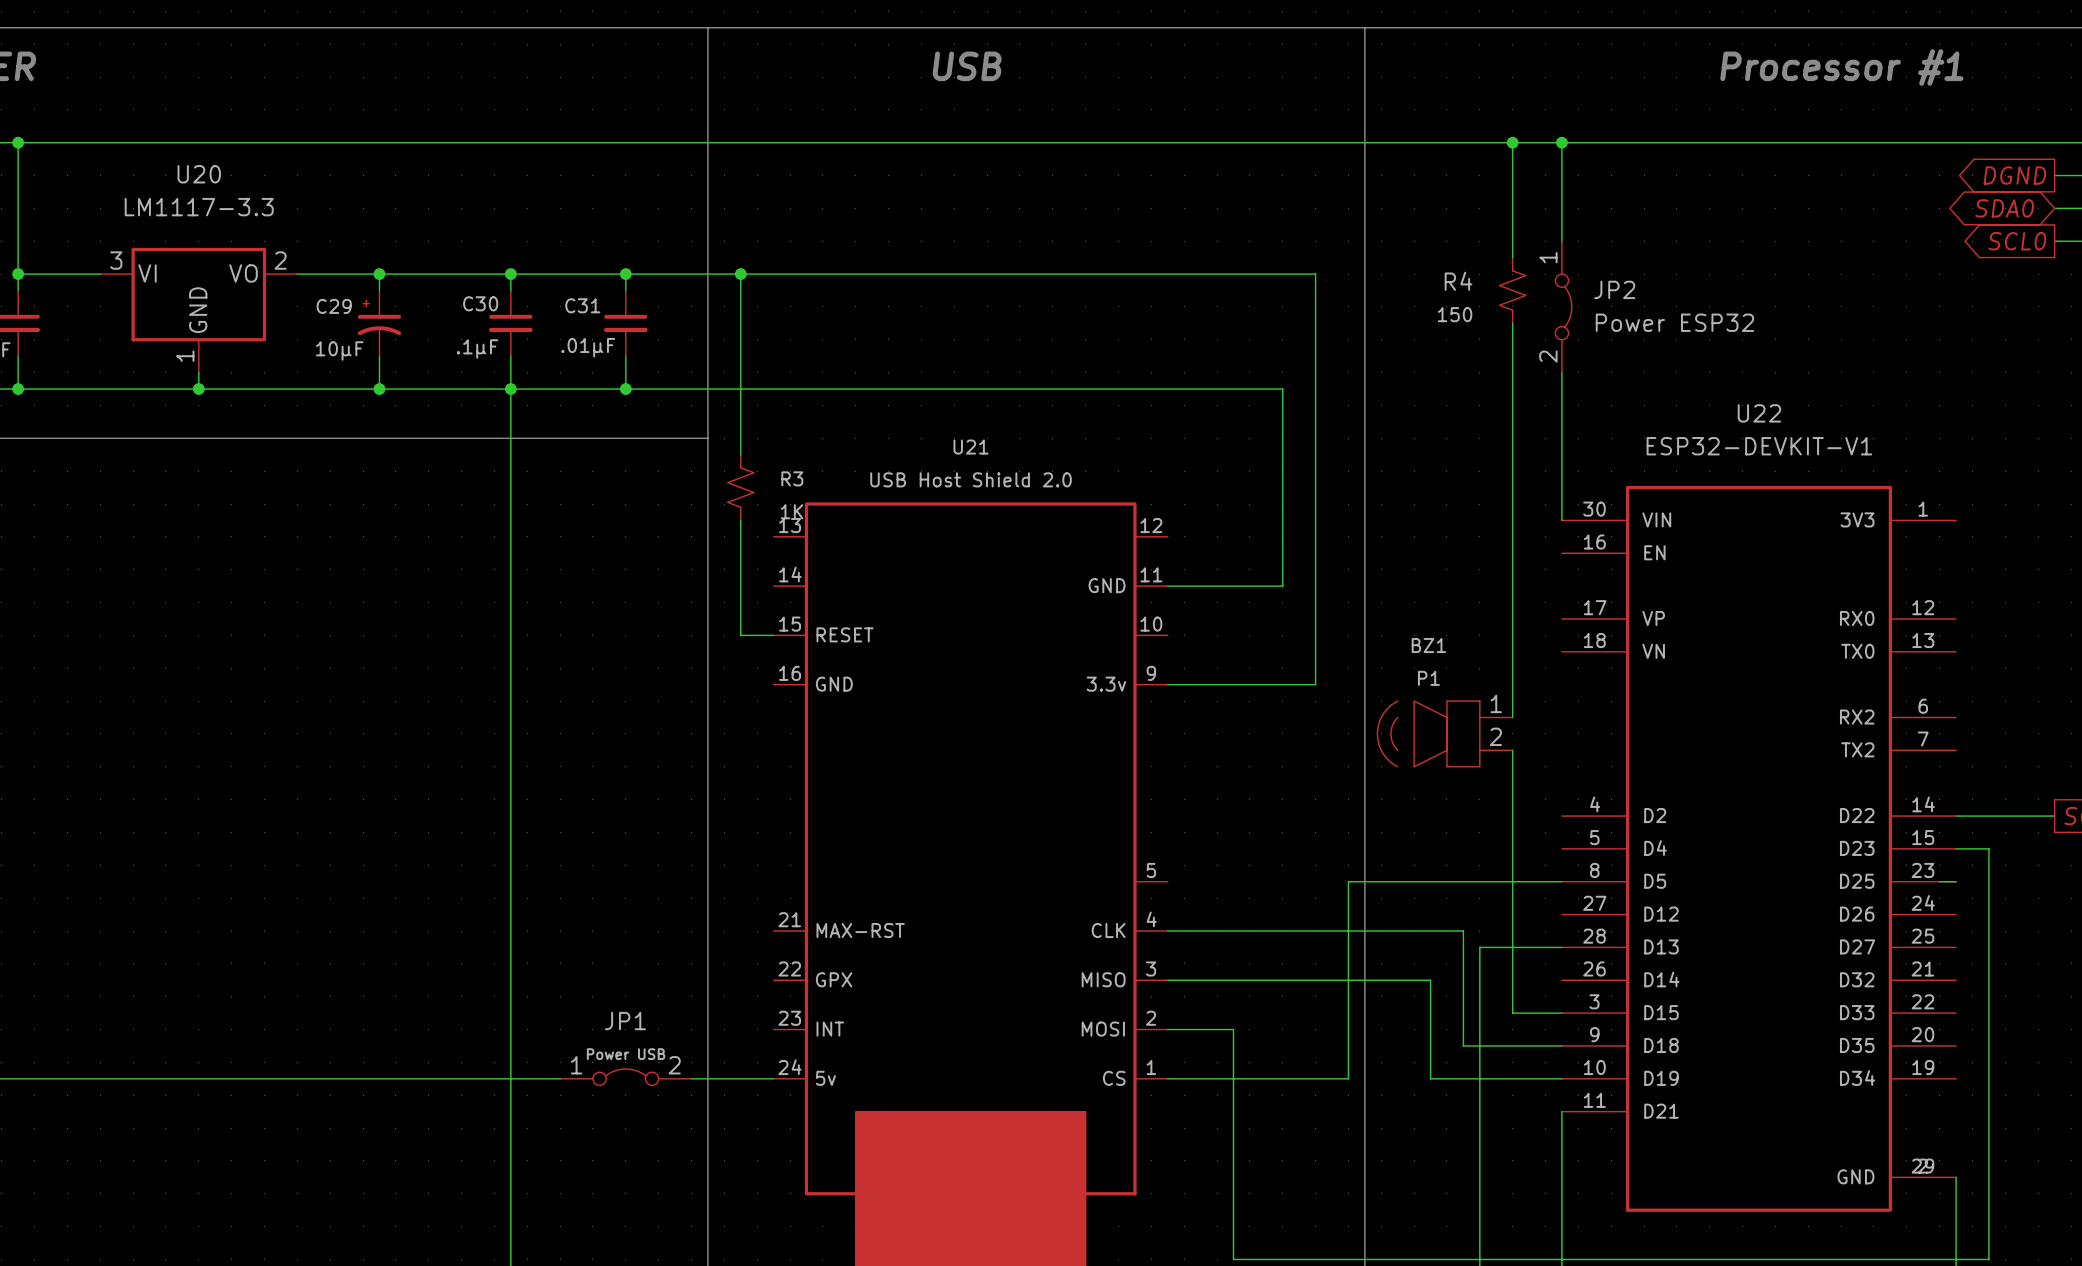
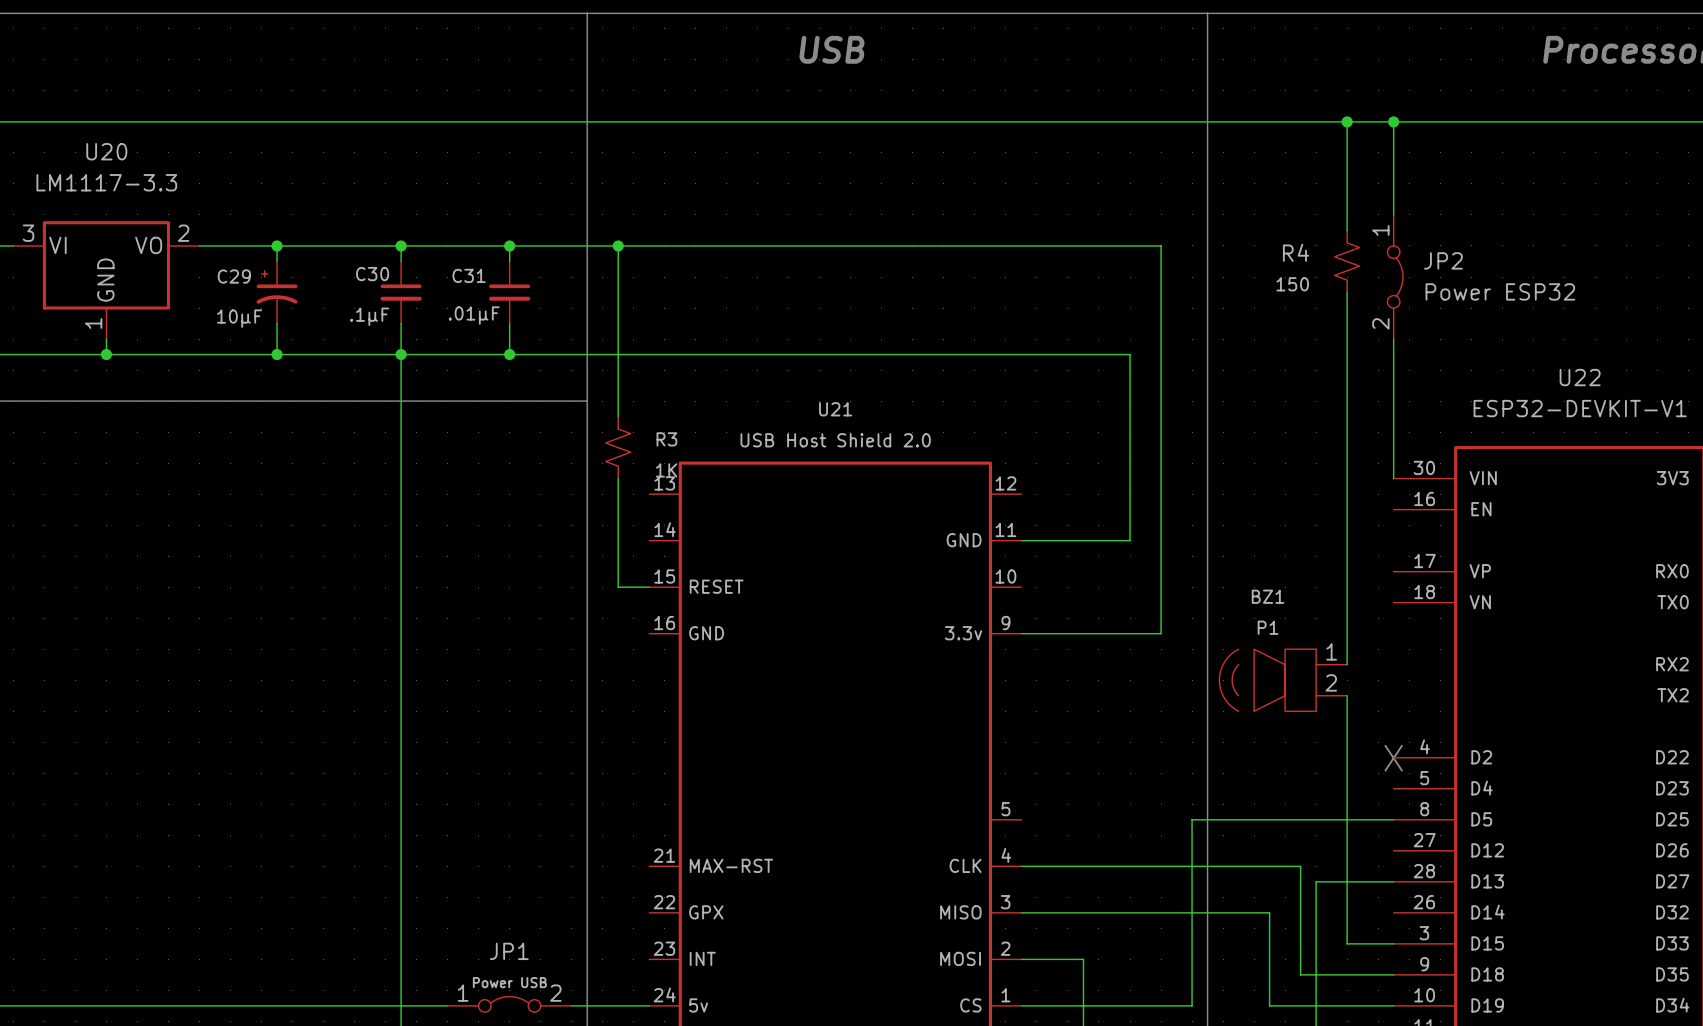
text: none -> X (1393, 758)

